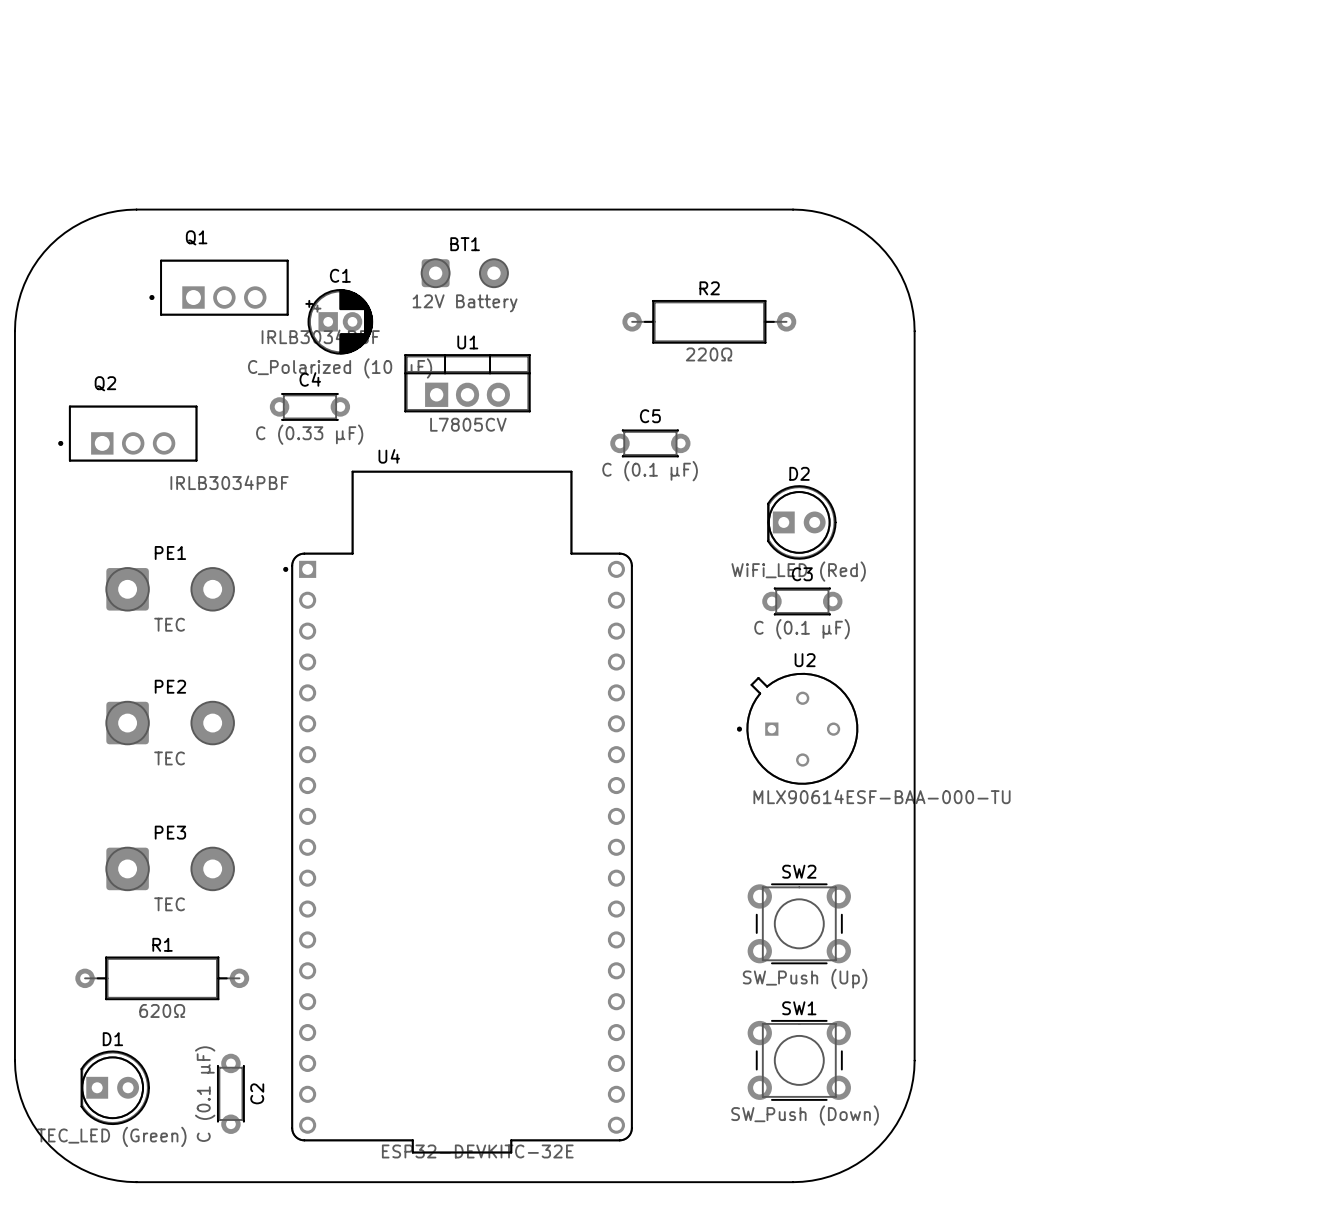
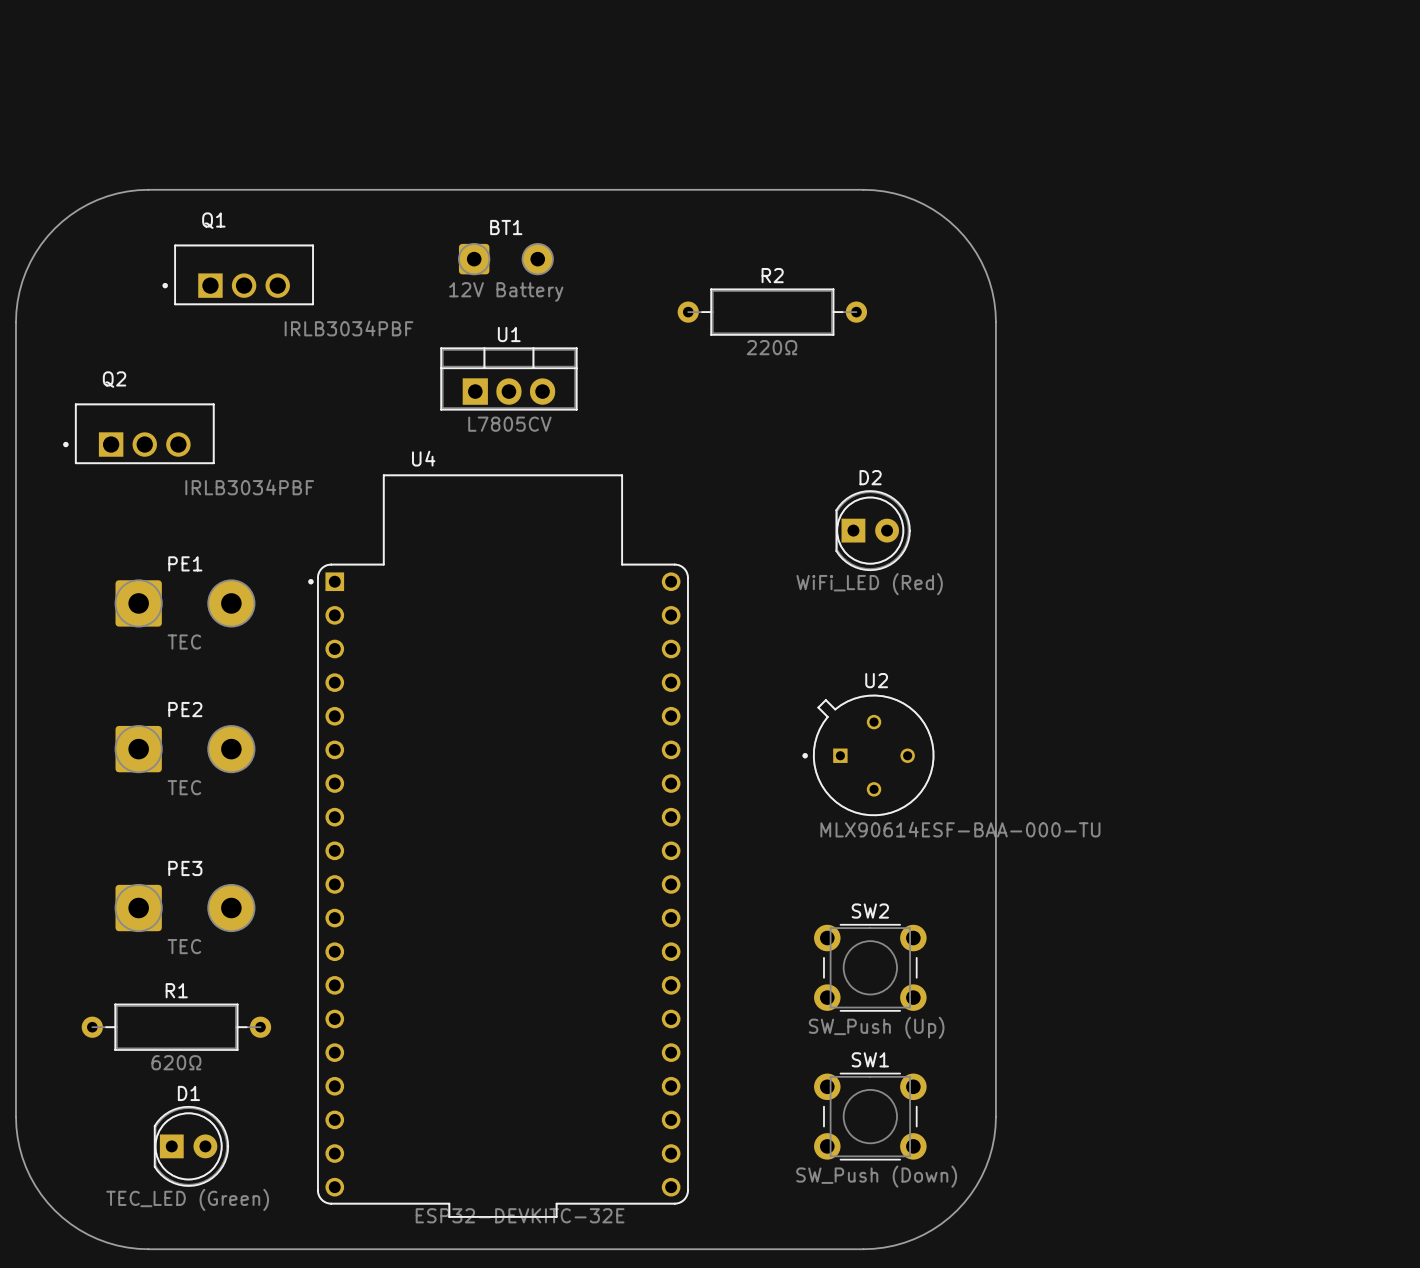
C1: C_Polarized (10 μF) (339, 321) -> none
C4: C (0.33 μF) (309, 406) -> none
C5: C (0.1 μF) (650, 443) -> none
C3: C (0.1 μF) (802, 601) -> none
D1 position: (115, 1087) -> (191, 1146)
C2: C (0.1 μF) (230, 1093) -> none

